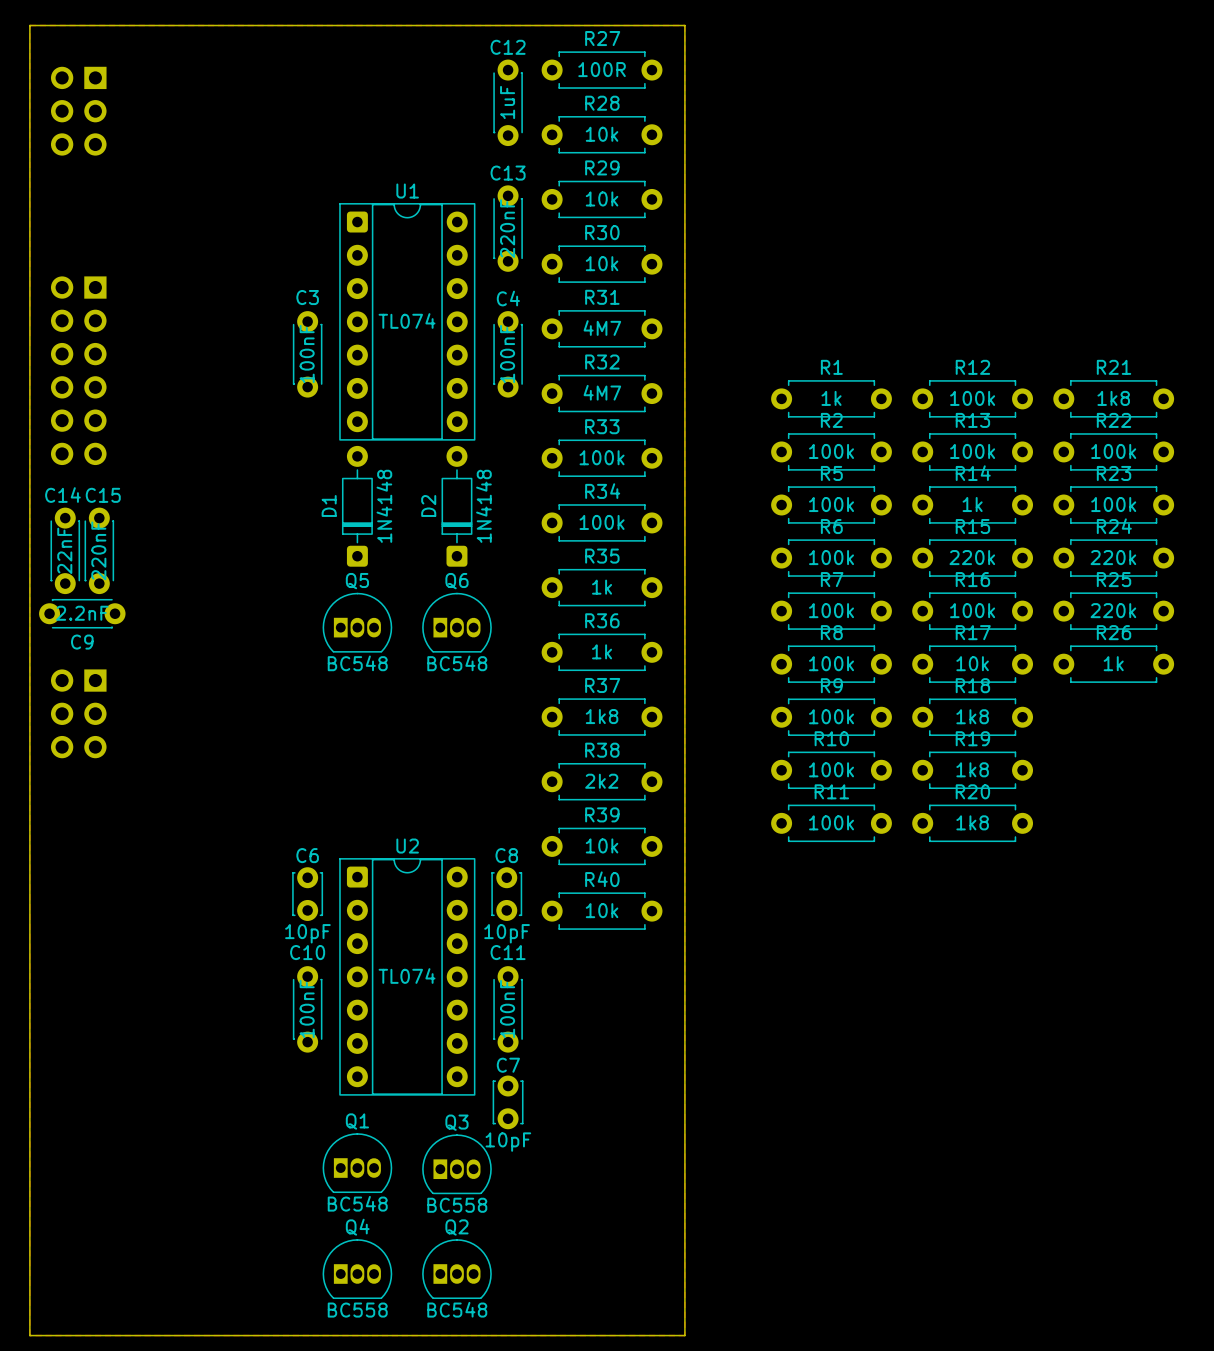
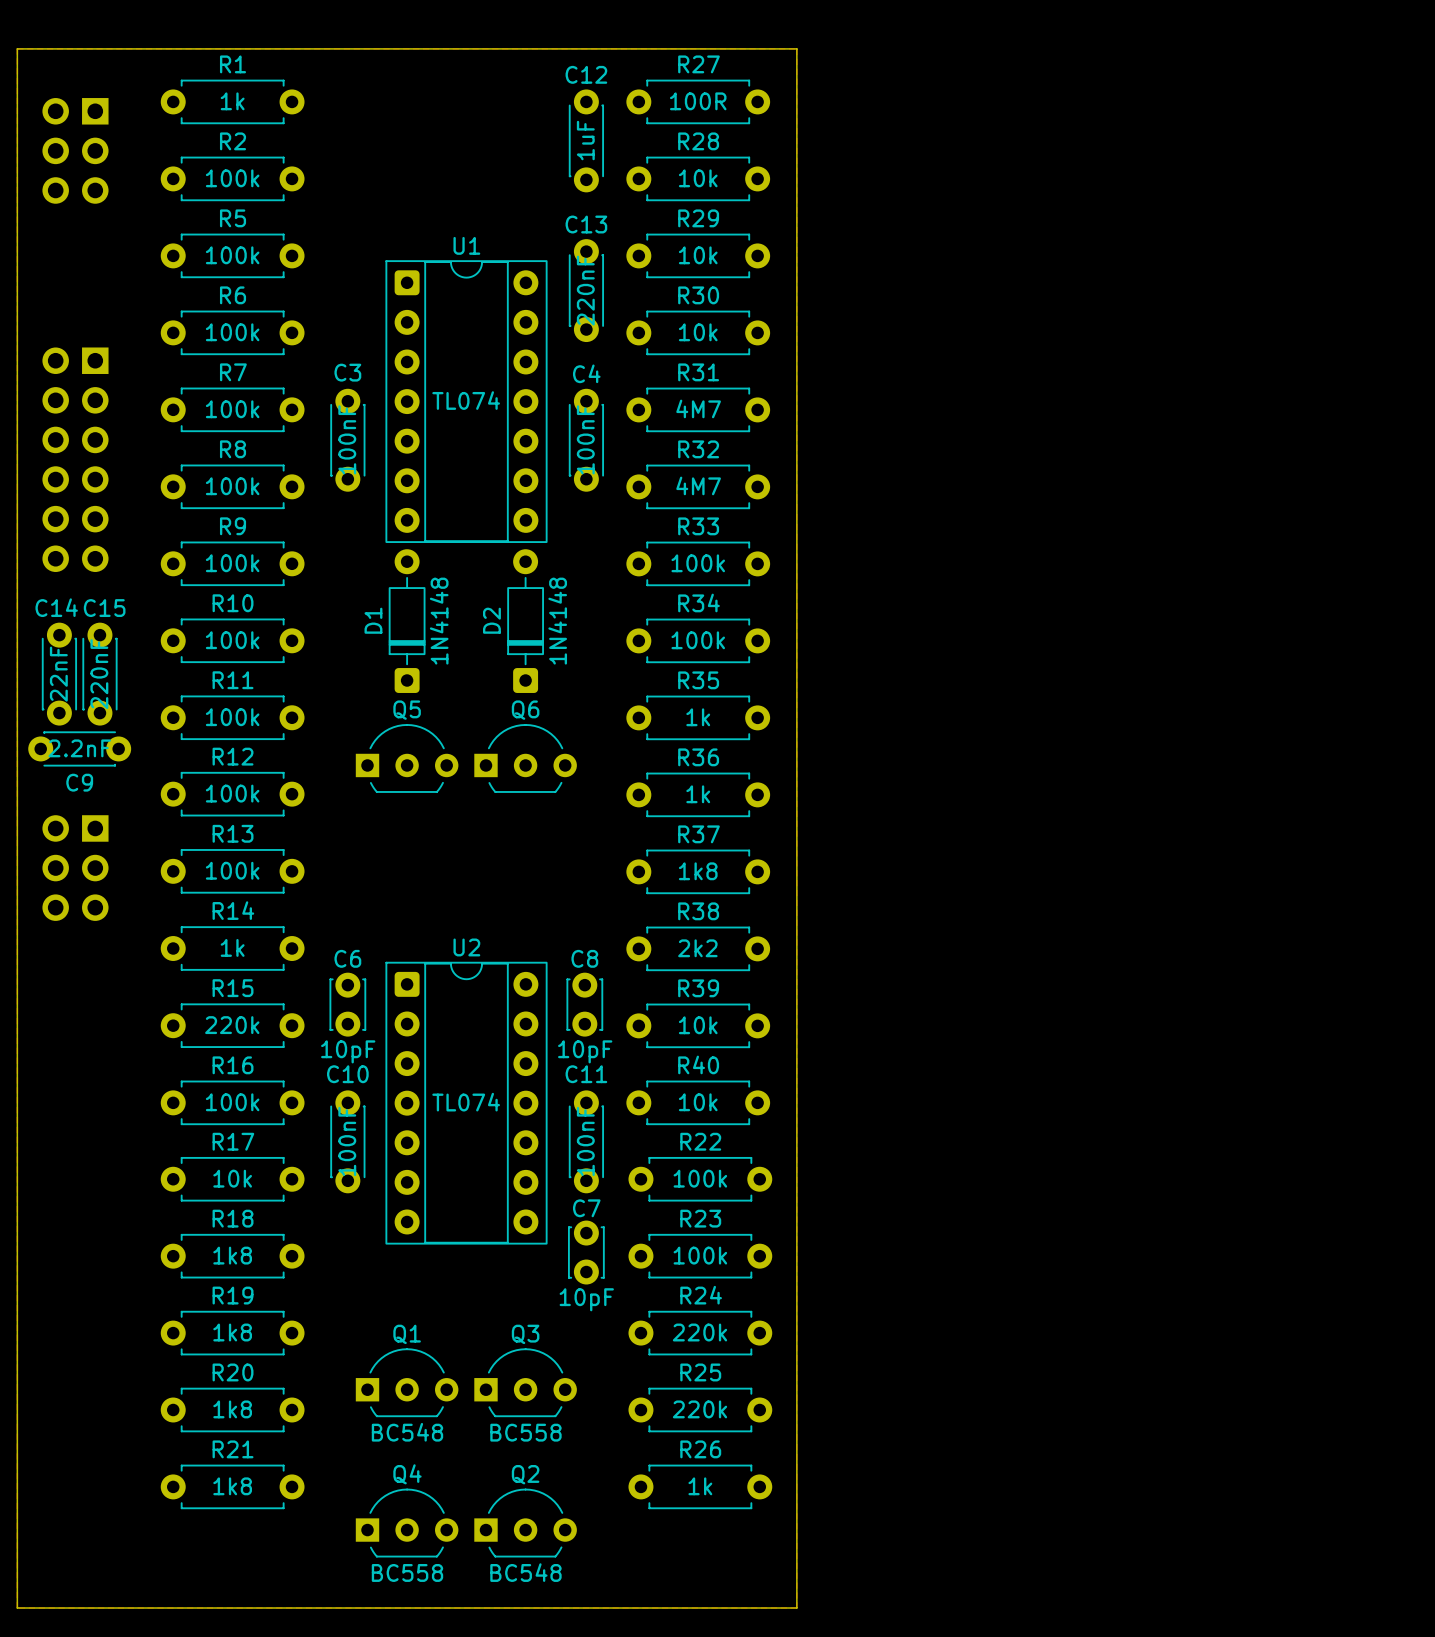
R1 position: (831, 398) -> (232, 101)
R12 position: (972, 398) -> (232, 794)
R21 position: (1113, 398) -> (232, 1486)
R2 position: (831, 451) -> (232, 178)
R13 position: (972, 451) -> (232, 871)
R22 position: (1113, 451) -> (700, 1179)
R5 position: (831, 505) -> (232, 255)
R14 position: (972, 505) -> (232, 948)
R23 position: (1113, 505) -> (700, 1256)
R6 position: (831, 558) -> (232, 332)
R15 position: (972, 558) -> (232, 1025)
R24 position: (1113, 558) -> (700, 1333)
Q5 footprint: [322, 592, 393, 653] -> [355, 724, 459, 793]
Q6 footprint: [422, 592, 492, 653] -> [474, 724, 577, 793]
R7 position: (831, 611) -> (232, 409)
R16 position: (972, 611) -> (232, 1102)
R25 position: (1113, 611) -> (700, 1410)
Q5 value: BC548 (357, 663) -> none
Q6 value: BC548 (457, 663) -> none
R8 position: (831, 664) -> (232, 486)
R17 position: (972, 664) -> (232, 1179)
R26 position: (1113, 664) -> (700, 1486)
R9 position: (831, 717) -> (232, 563)
R18 position: (972, 717) -> (232, 1256)
R10 position: (831, 770) -> (232, 640)
R19 position: (972, 770) -> (232, 1333)
R11 position: (831, 823) -> (232, 717)
R20 position: (972, 823) -> (232, 1410)
C6 position: (307, 894) -> (347, 1004)
C8 position: (506, 894) -> (584, 1004)
U2 position: (407, 976) -> (466, 1103)
C10 position: (307, 1009) -> (347, 1141)
C11 position: (508, 1009) -> (586, 1141)
C7 position: (508, 1102) -> (586, 1252)
Q1 footprint: [322, 1133, 393, 1194] -> [355, 1348, 459, 1418]
Q3 footprint: [422, 1134, 492, 1195] -> [474, 1348, 577, 1418]
Q4 footprint: [322, 1239, 393, 1300] -> [355, 1488, 459, 1558]
Q2 footprint: [422, 1239, 492, 1300] -> [474, 1488, 577, 1558]

